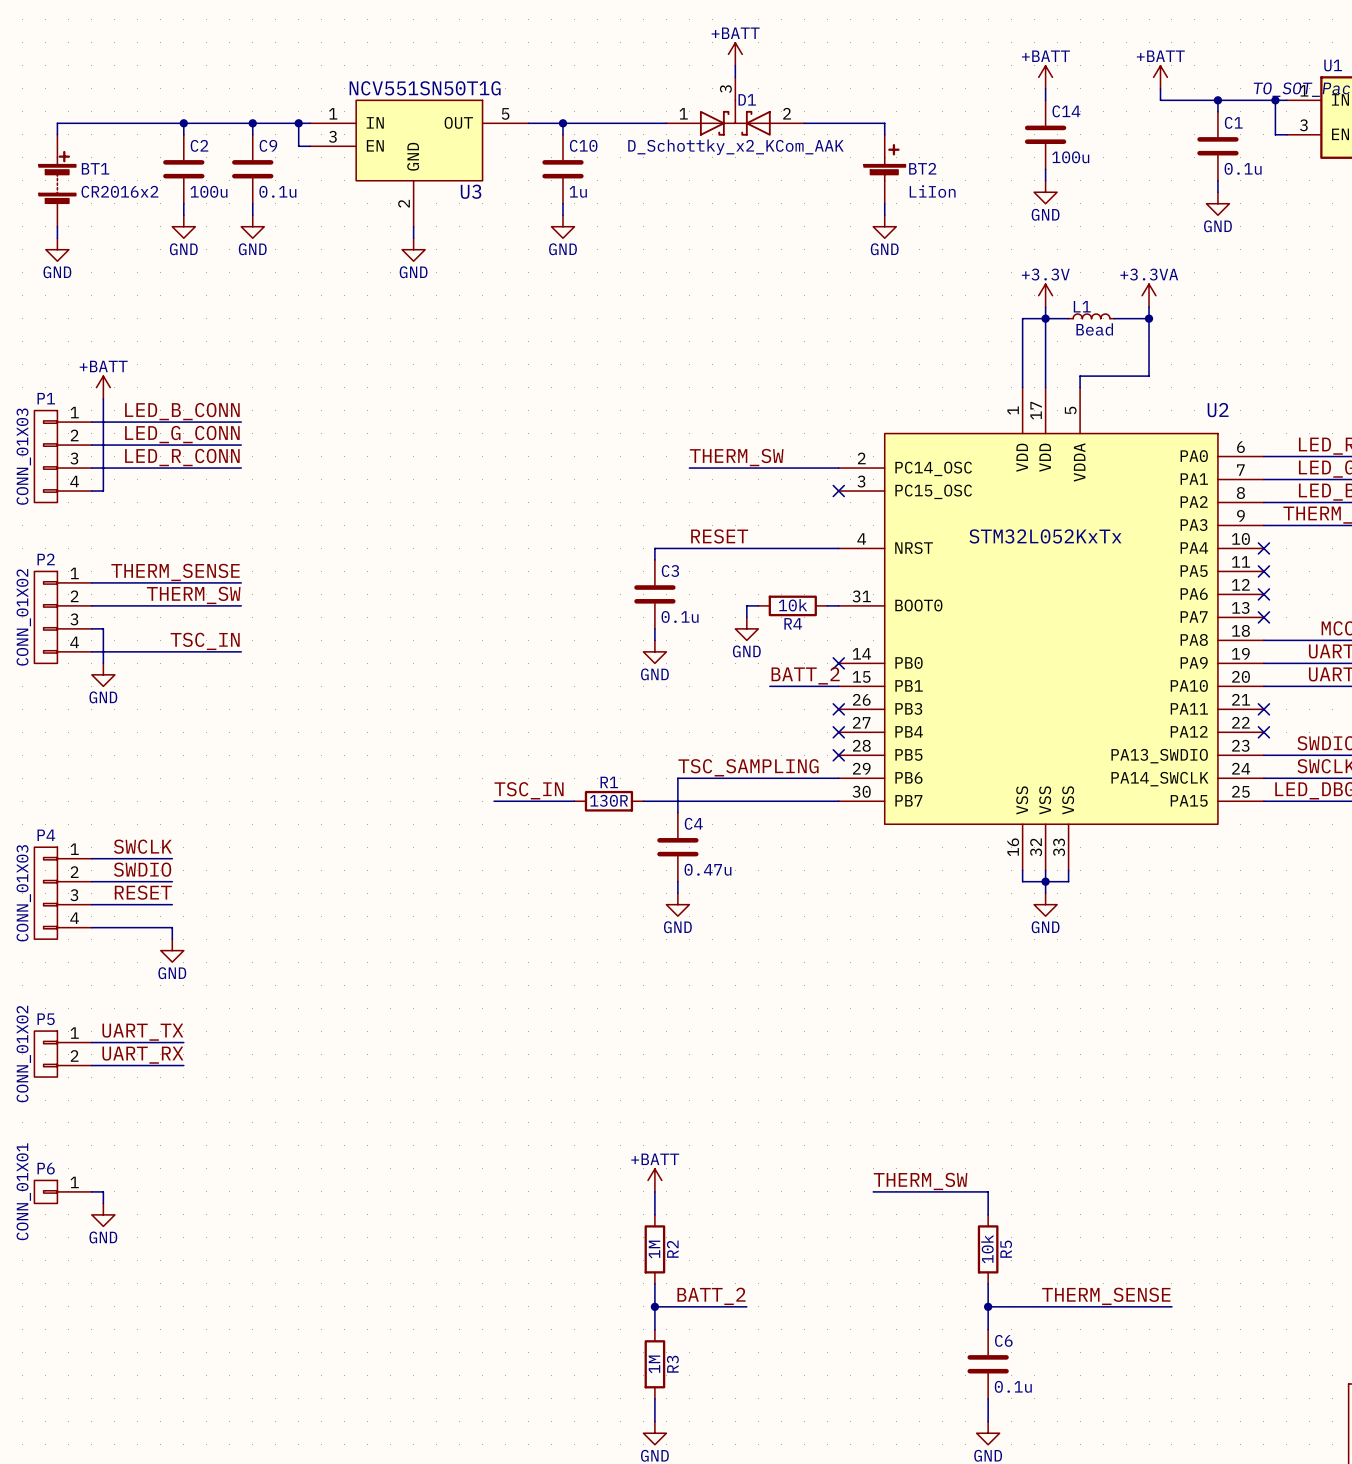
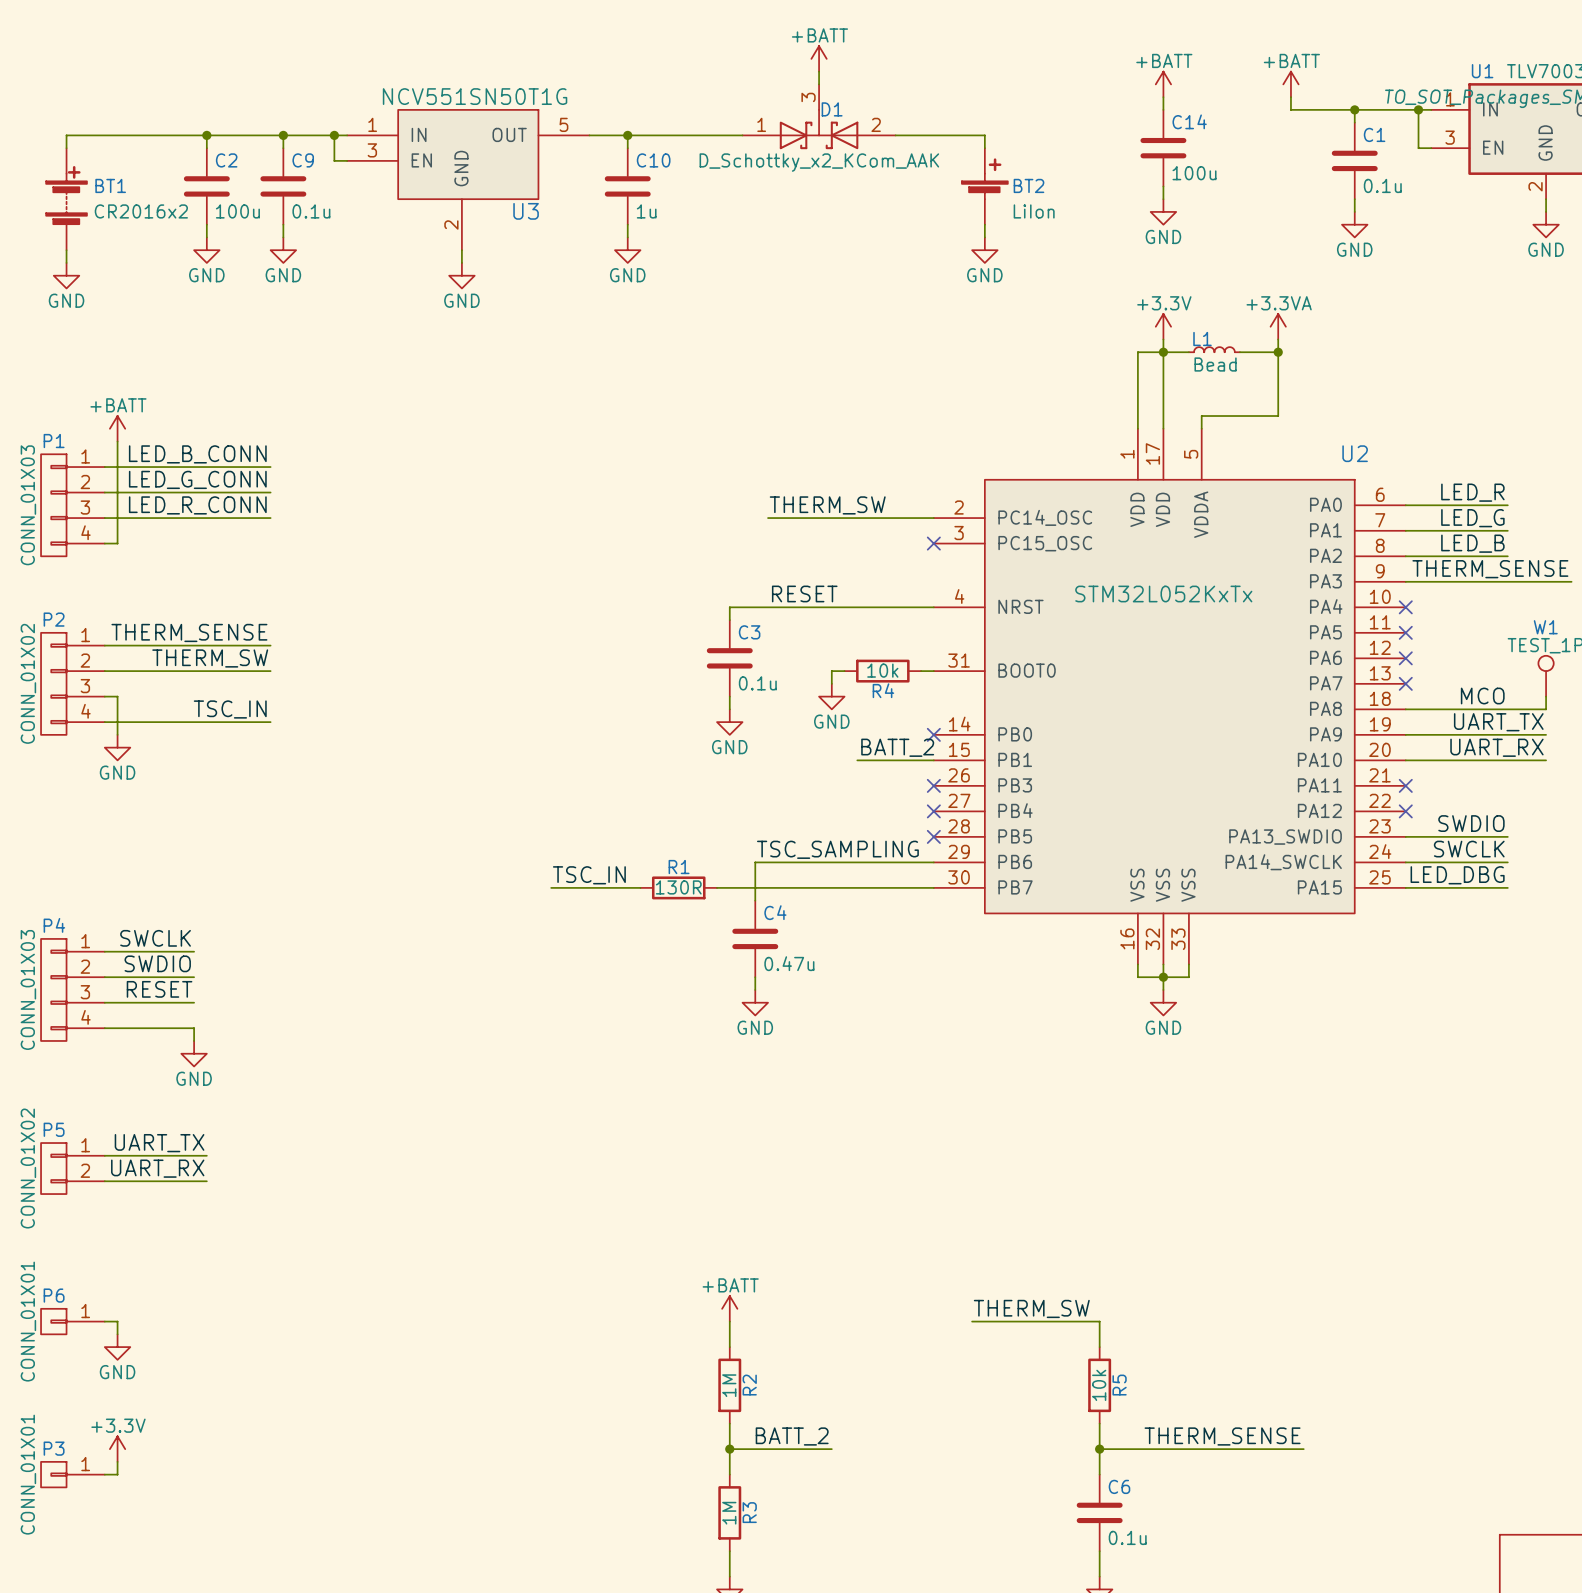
power symbol: none -> +3.3V (117, 1449)
wire: none -> (117, 1461) (117, 1474) (104, 1474)
P3: none -> CONN_01X01 (72, 1474)

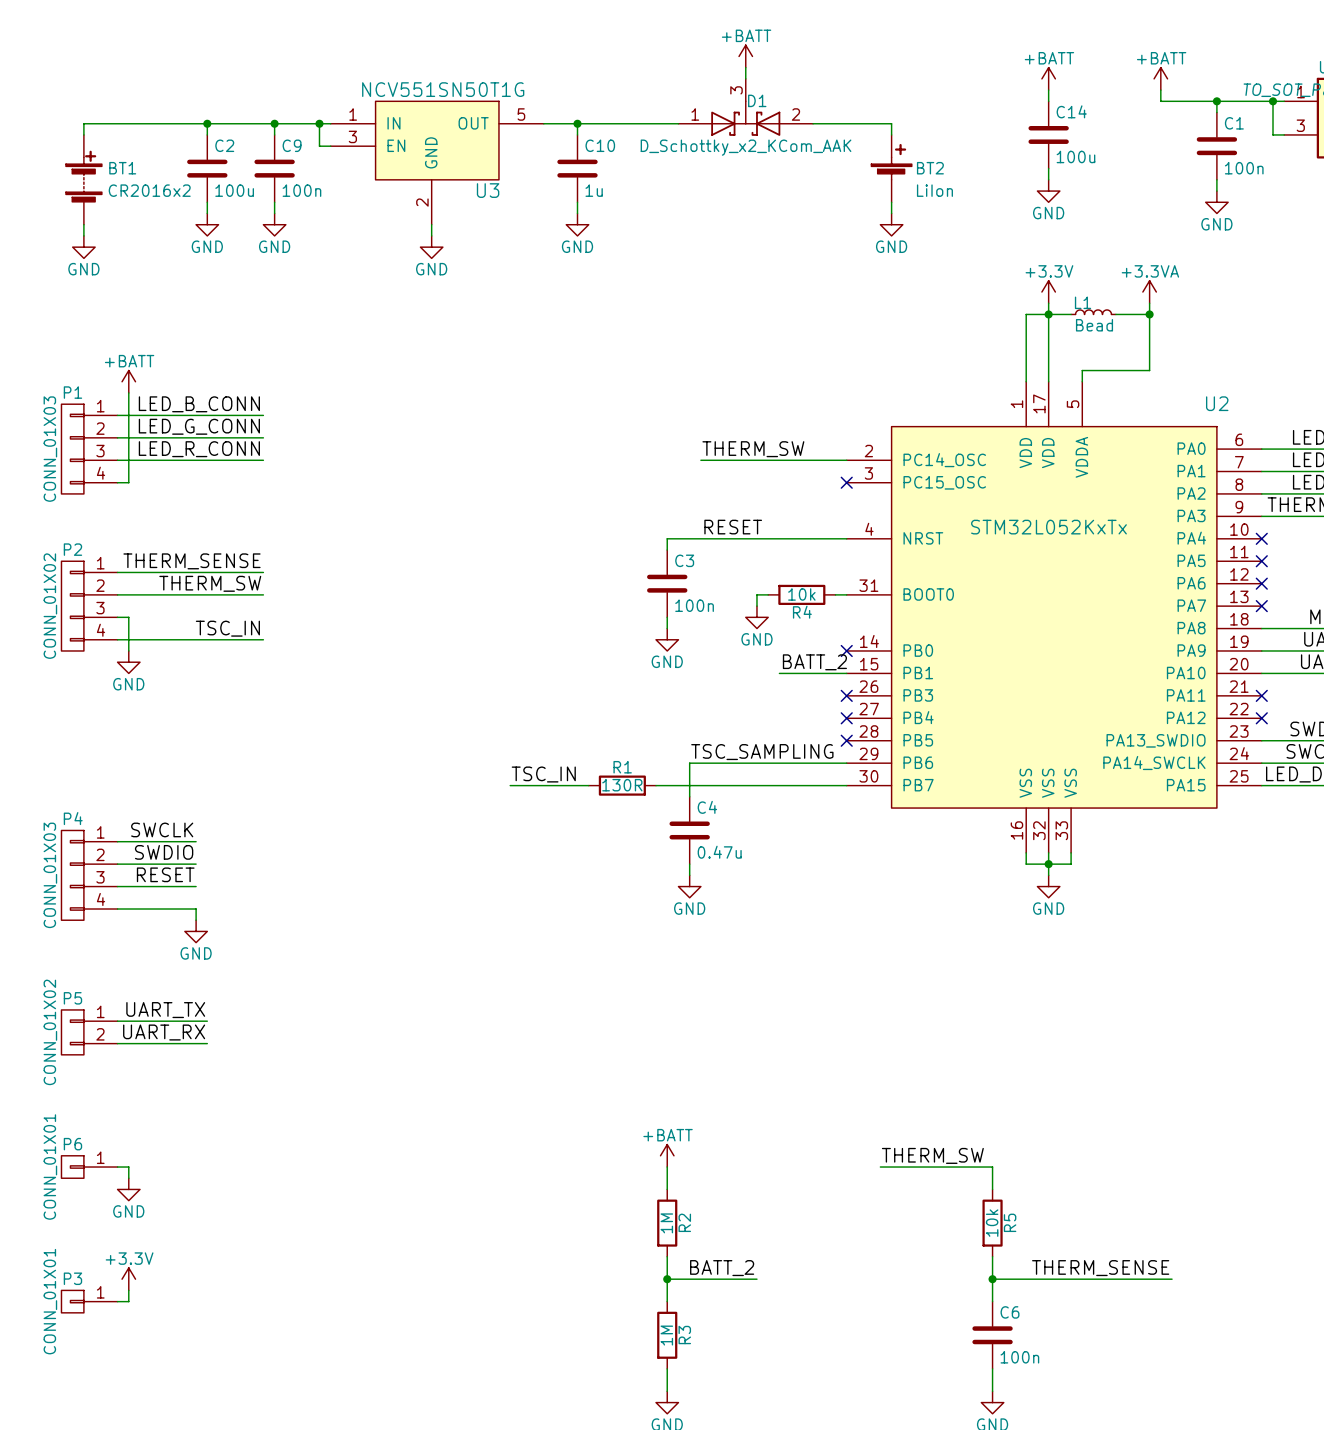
C1 value: 0.1u (1382, 185) -> 100n (1244, 168)
C9 value: 0.1u (311, 211) -> 100n (301, 190)
C3 value: 0.1u (757, 683) -> 100n (694, 605)
C6 value: 0.1u (1127, 1537) -> 100n (1019, 1357)

